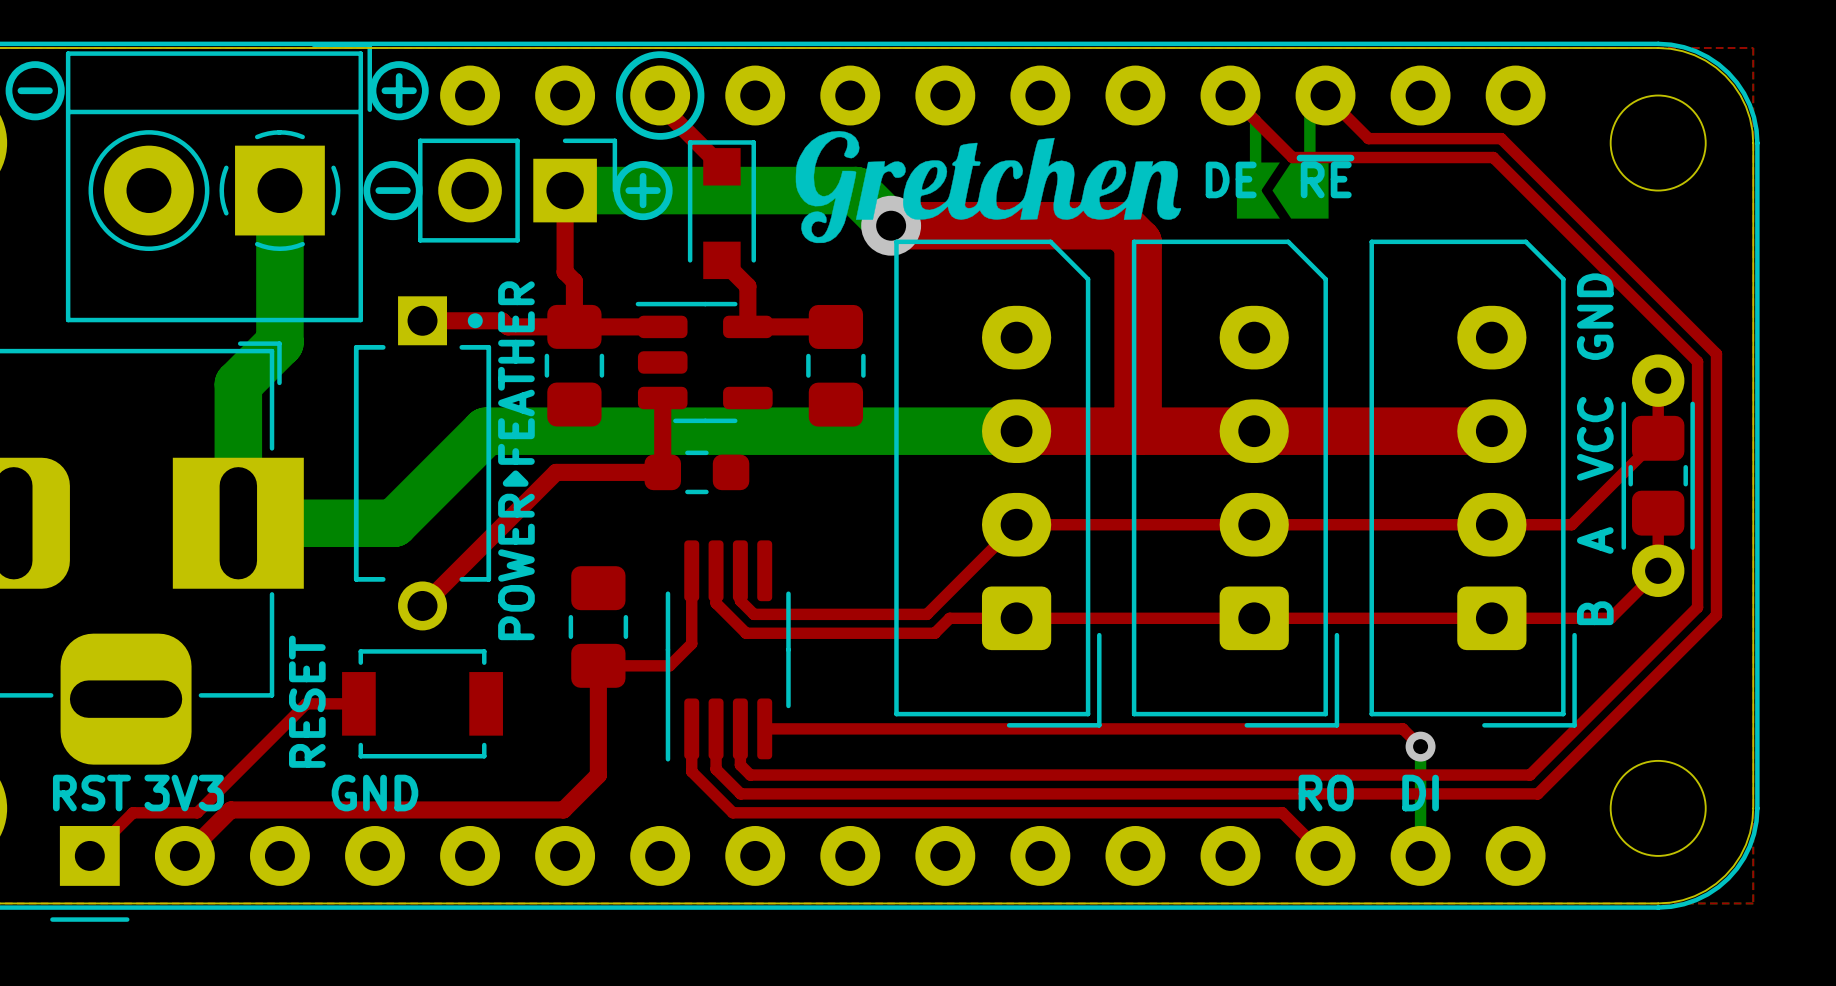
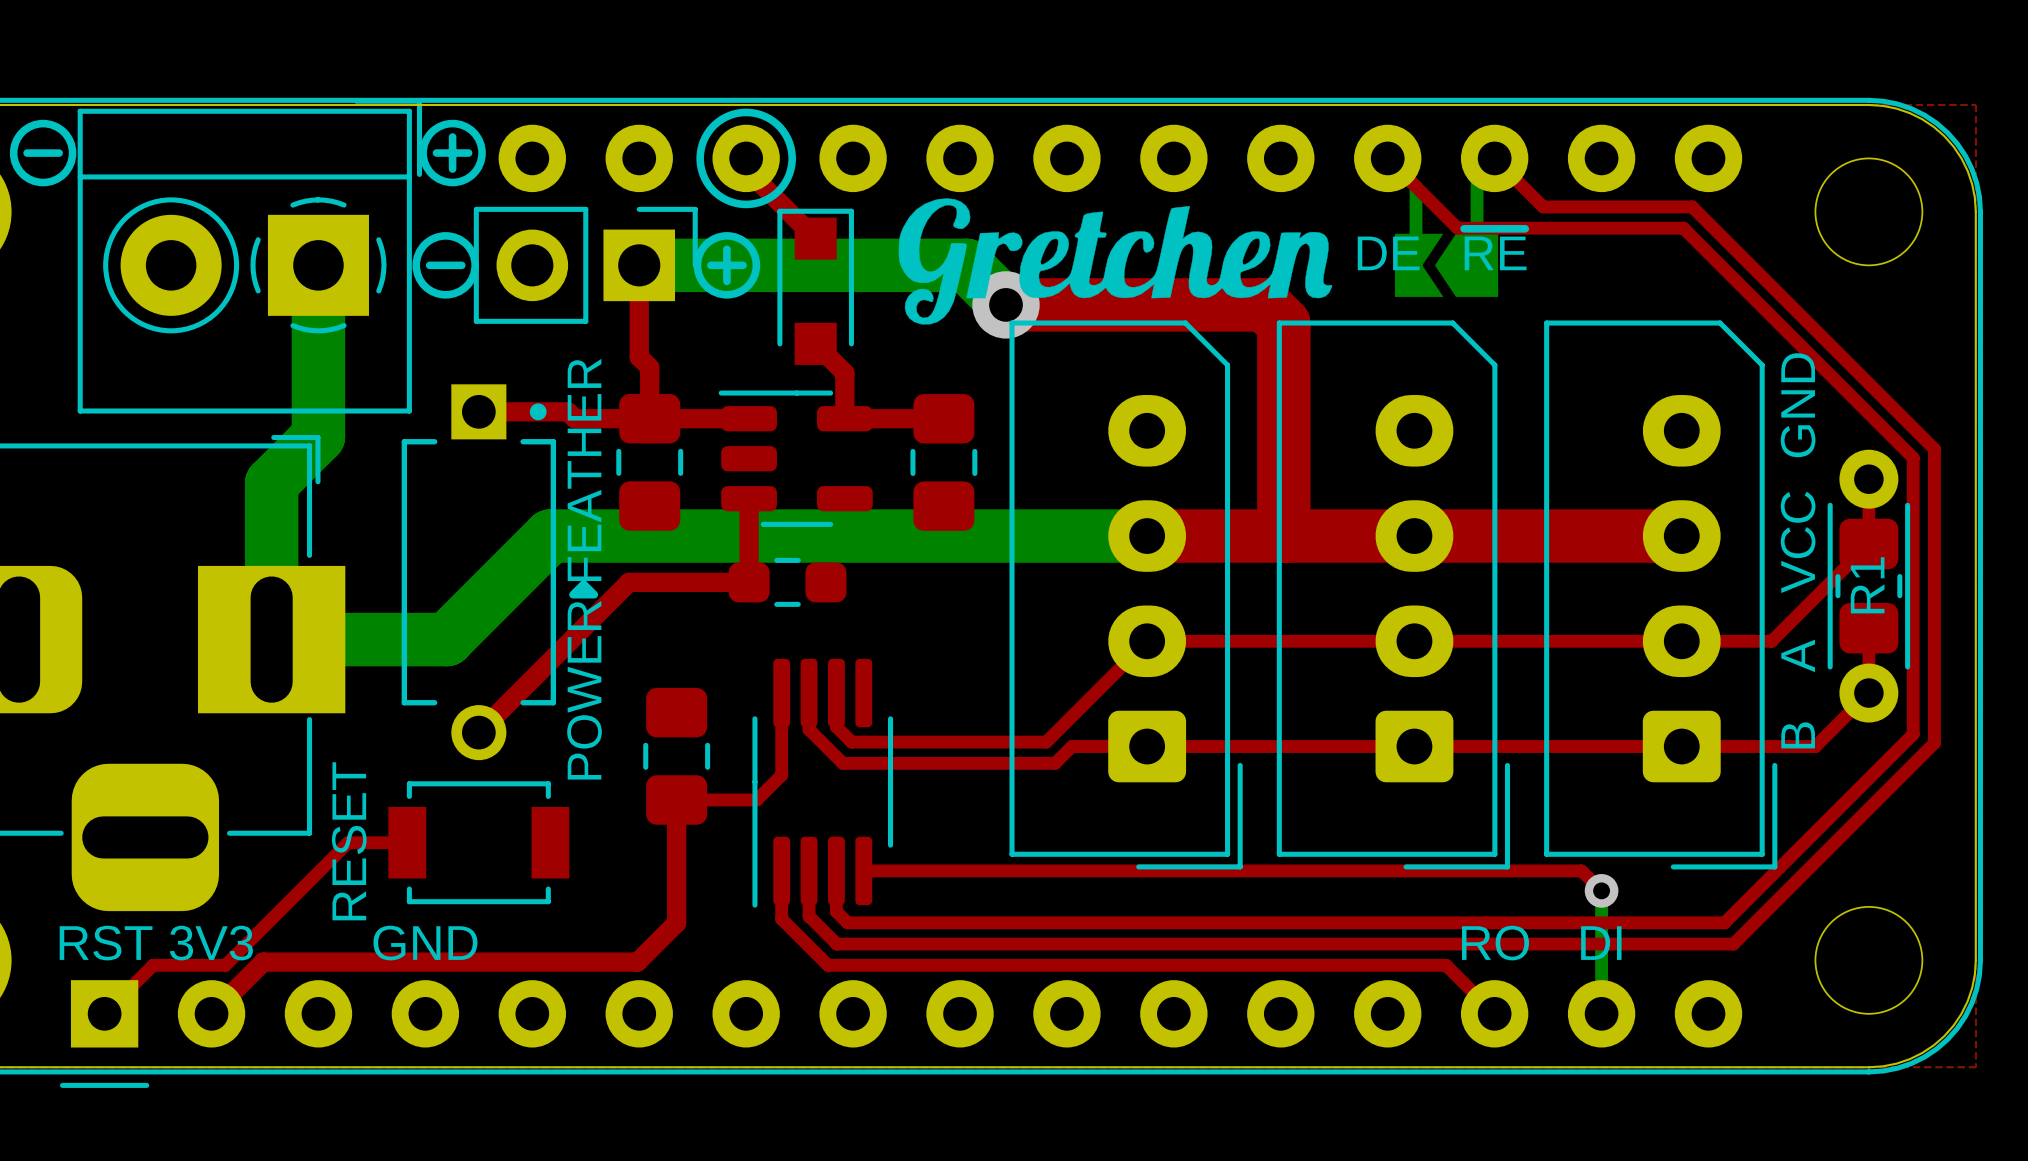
R1 name: none -> R1 (1867, 585)

